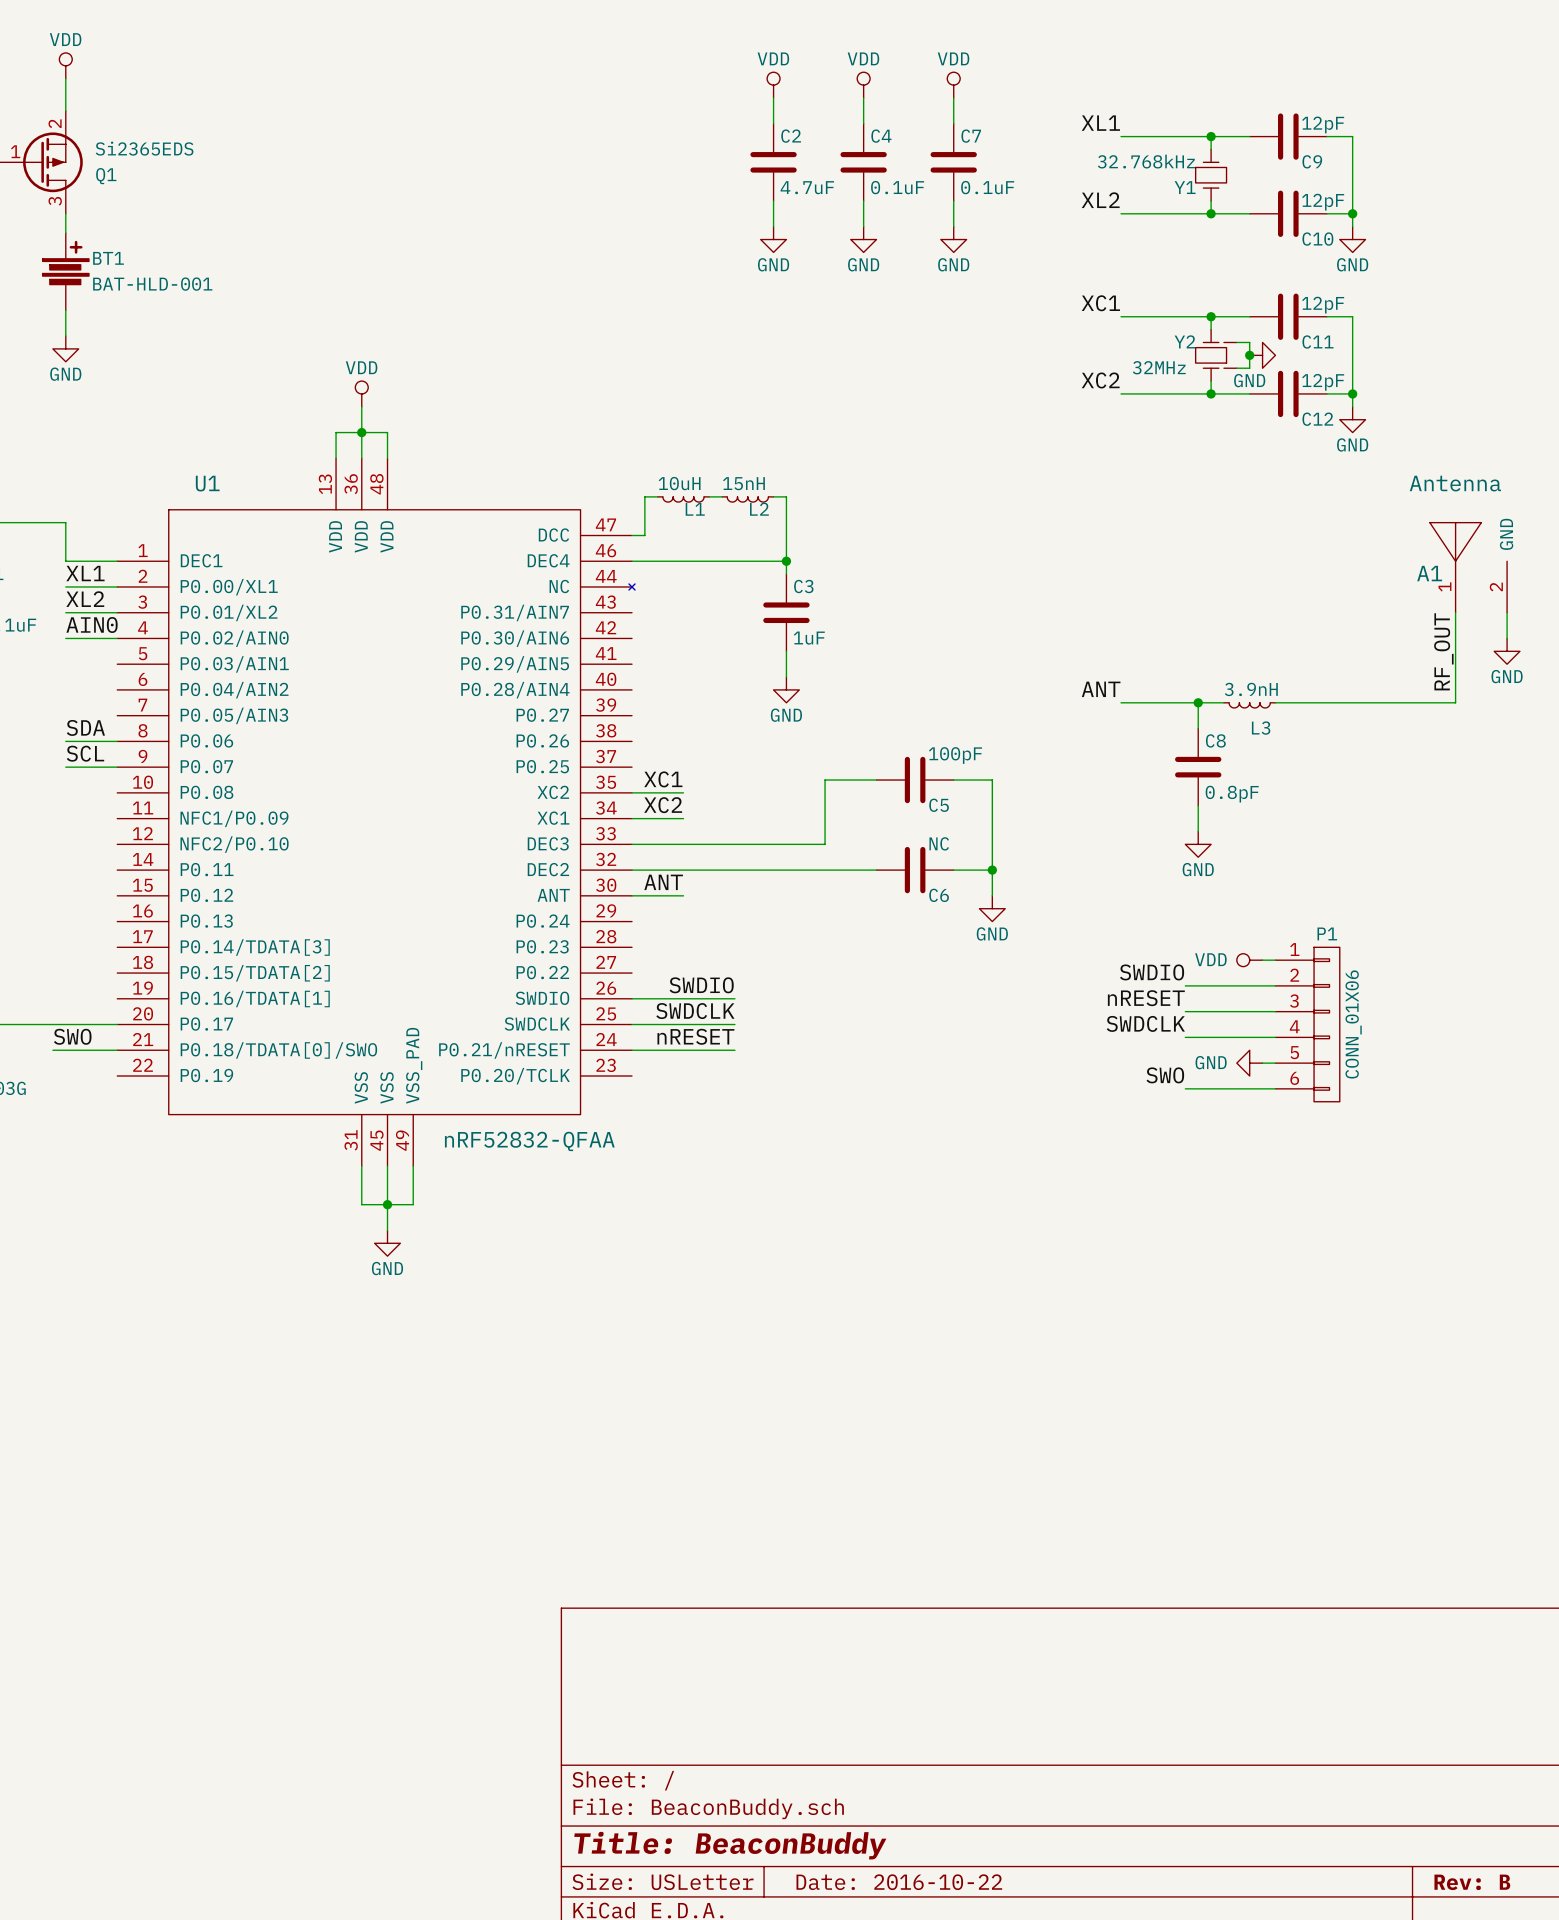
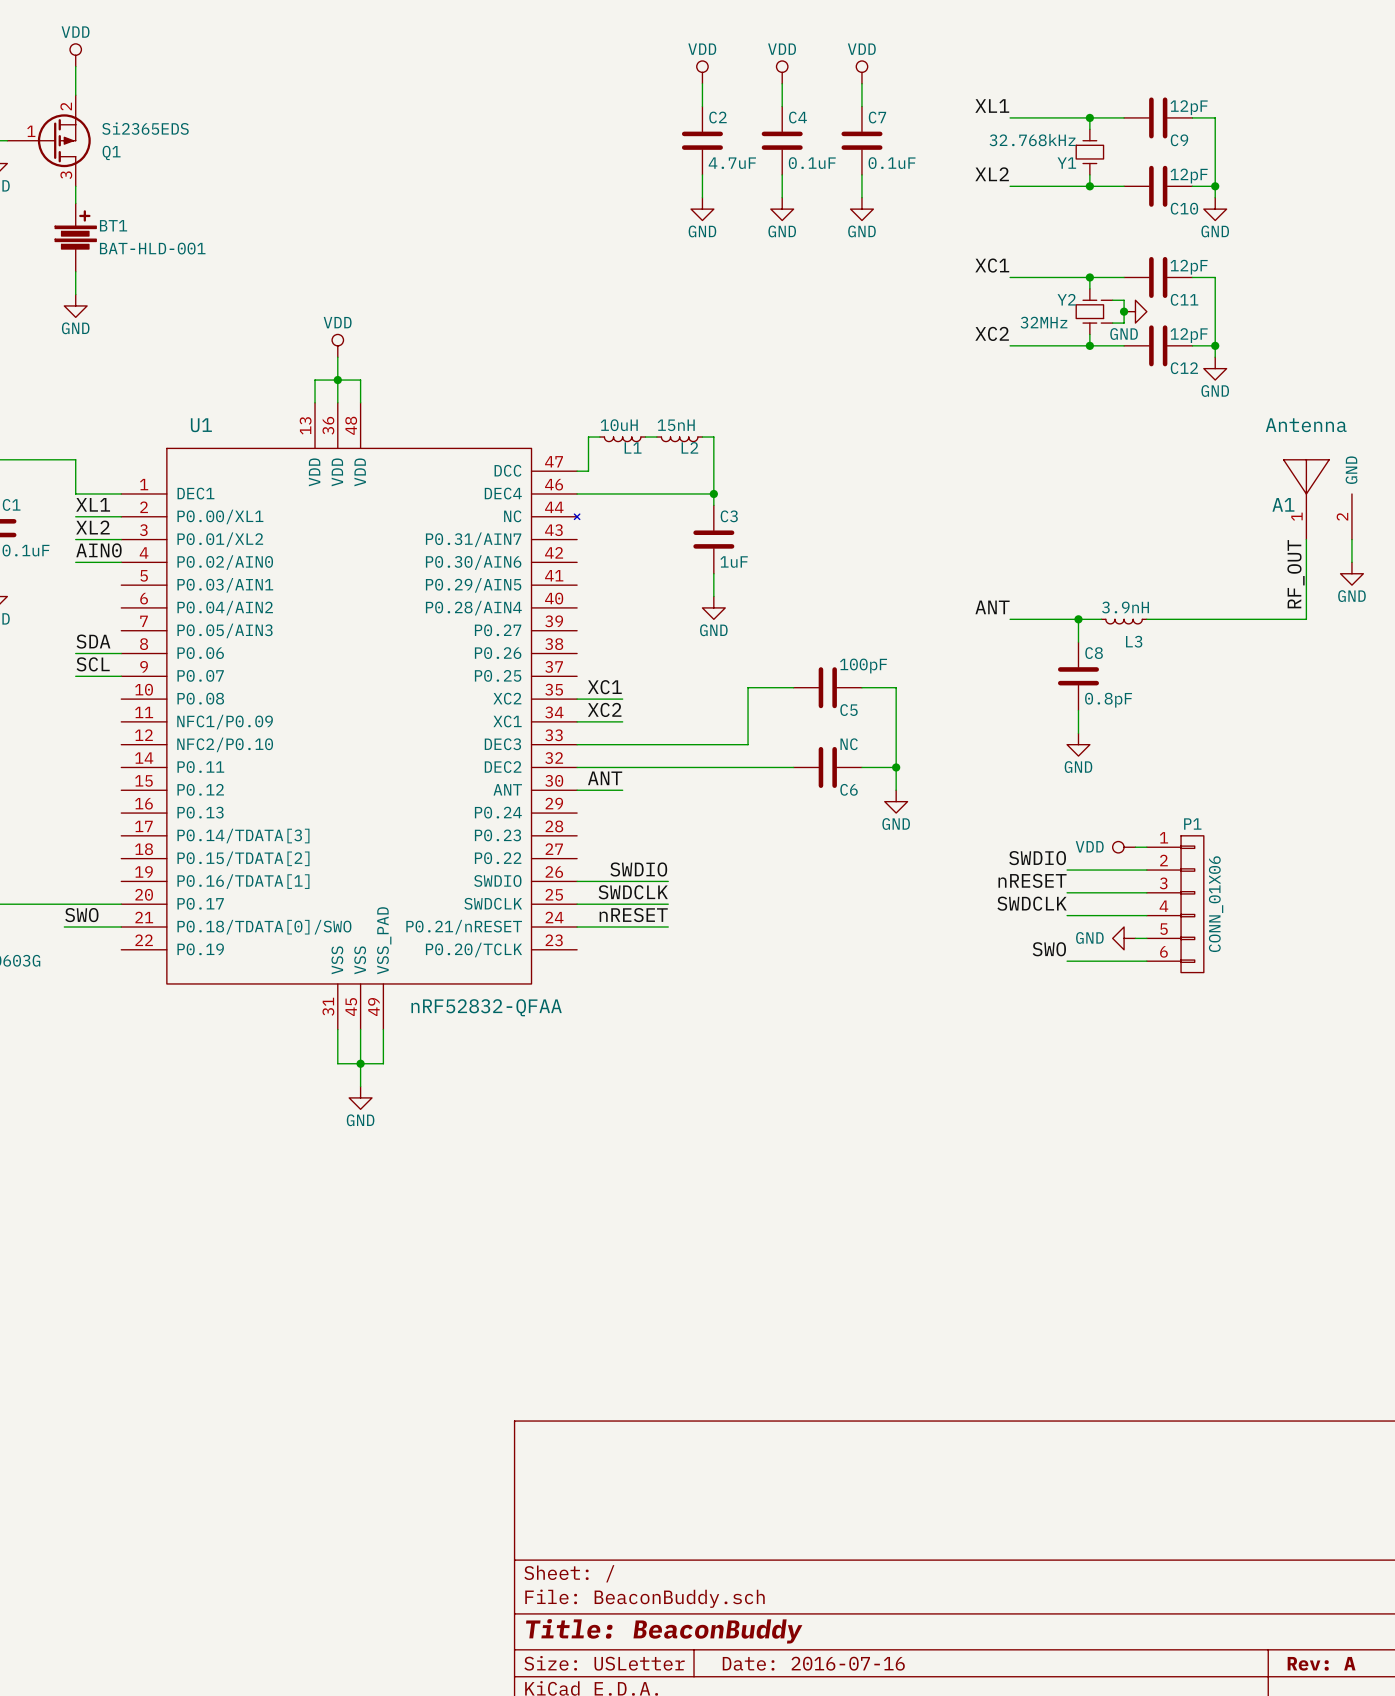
title block: Date: 2016-10-22 (899, 1882) -> Date: 2016-07-16 (813, 1663)
title block: Rev: B (1472, 1882) -> Rev: A (1321, 1663)

